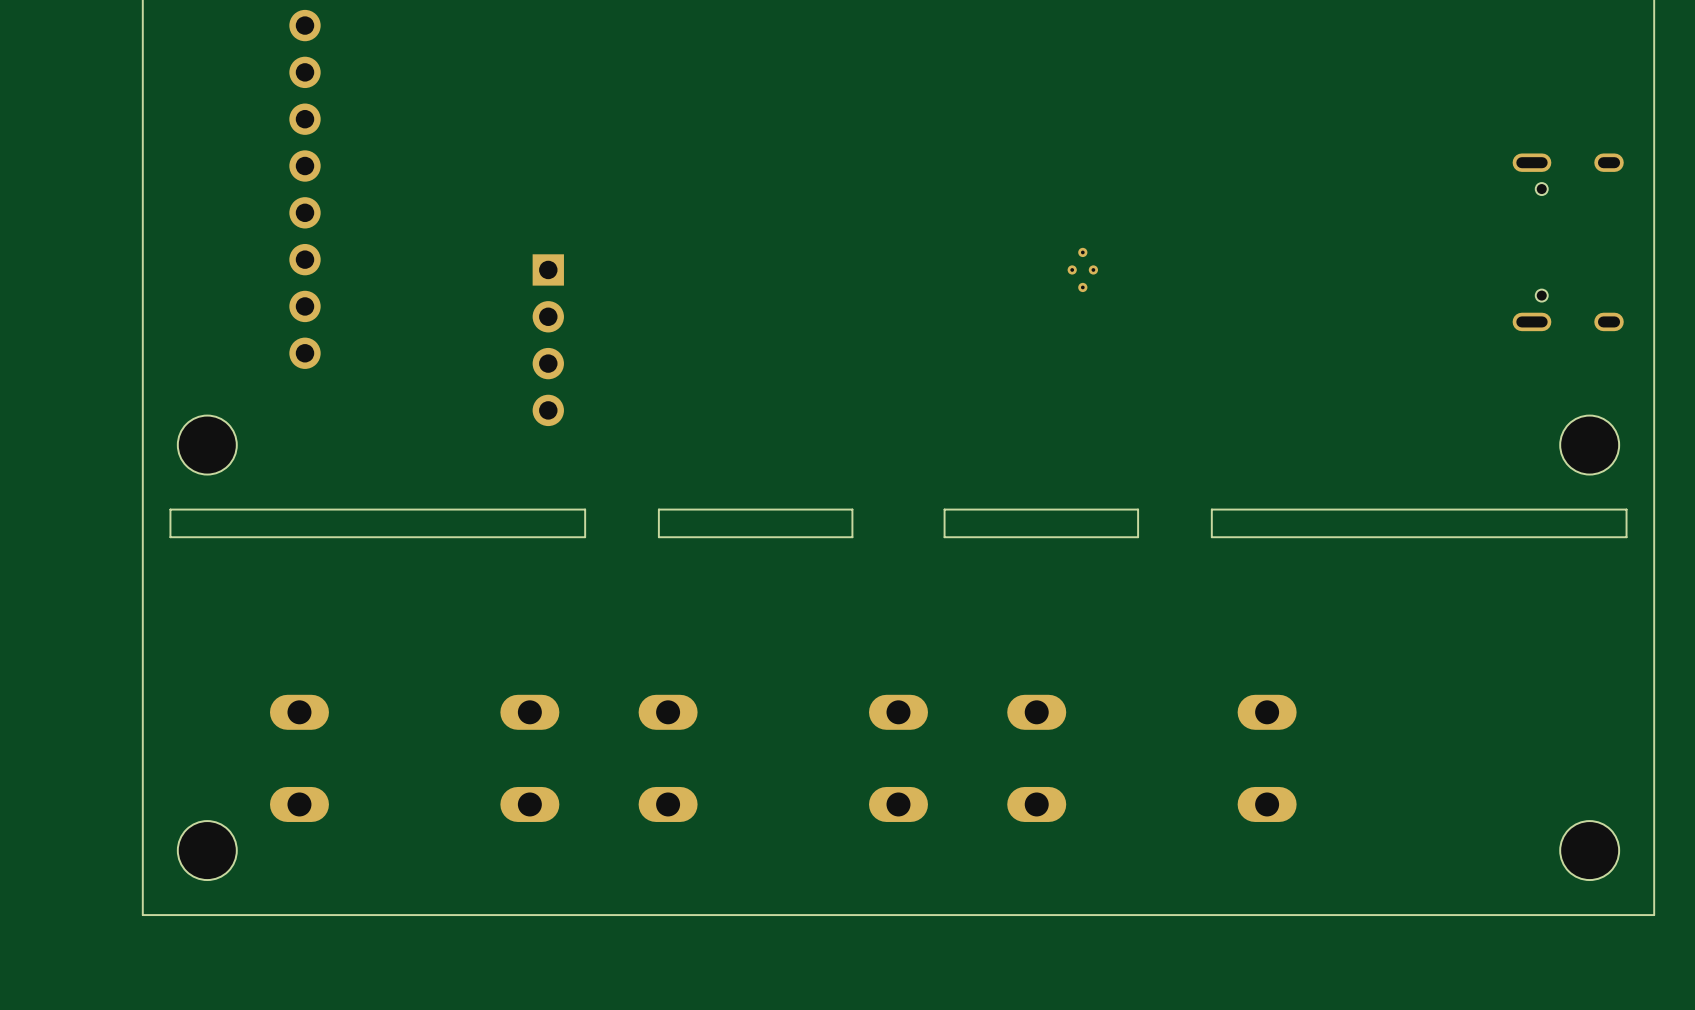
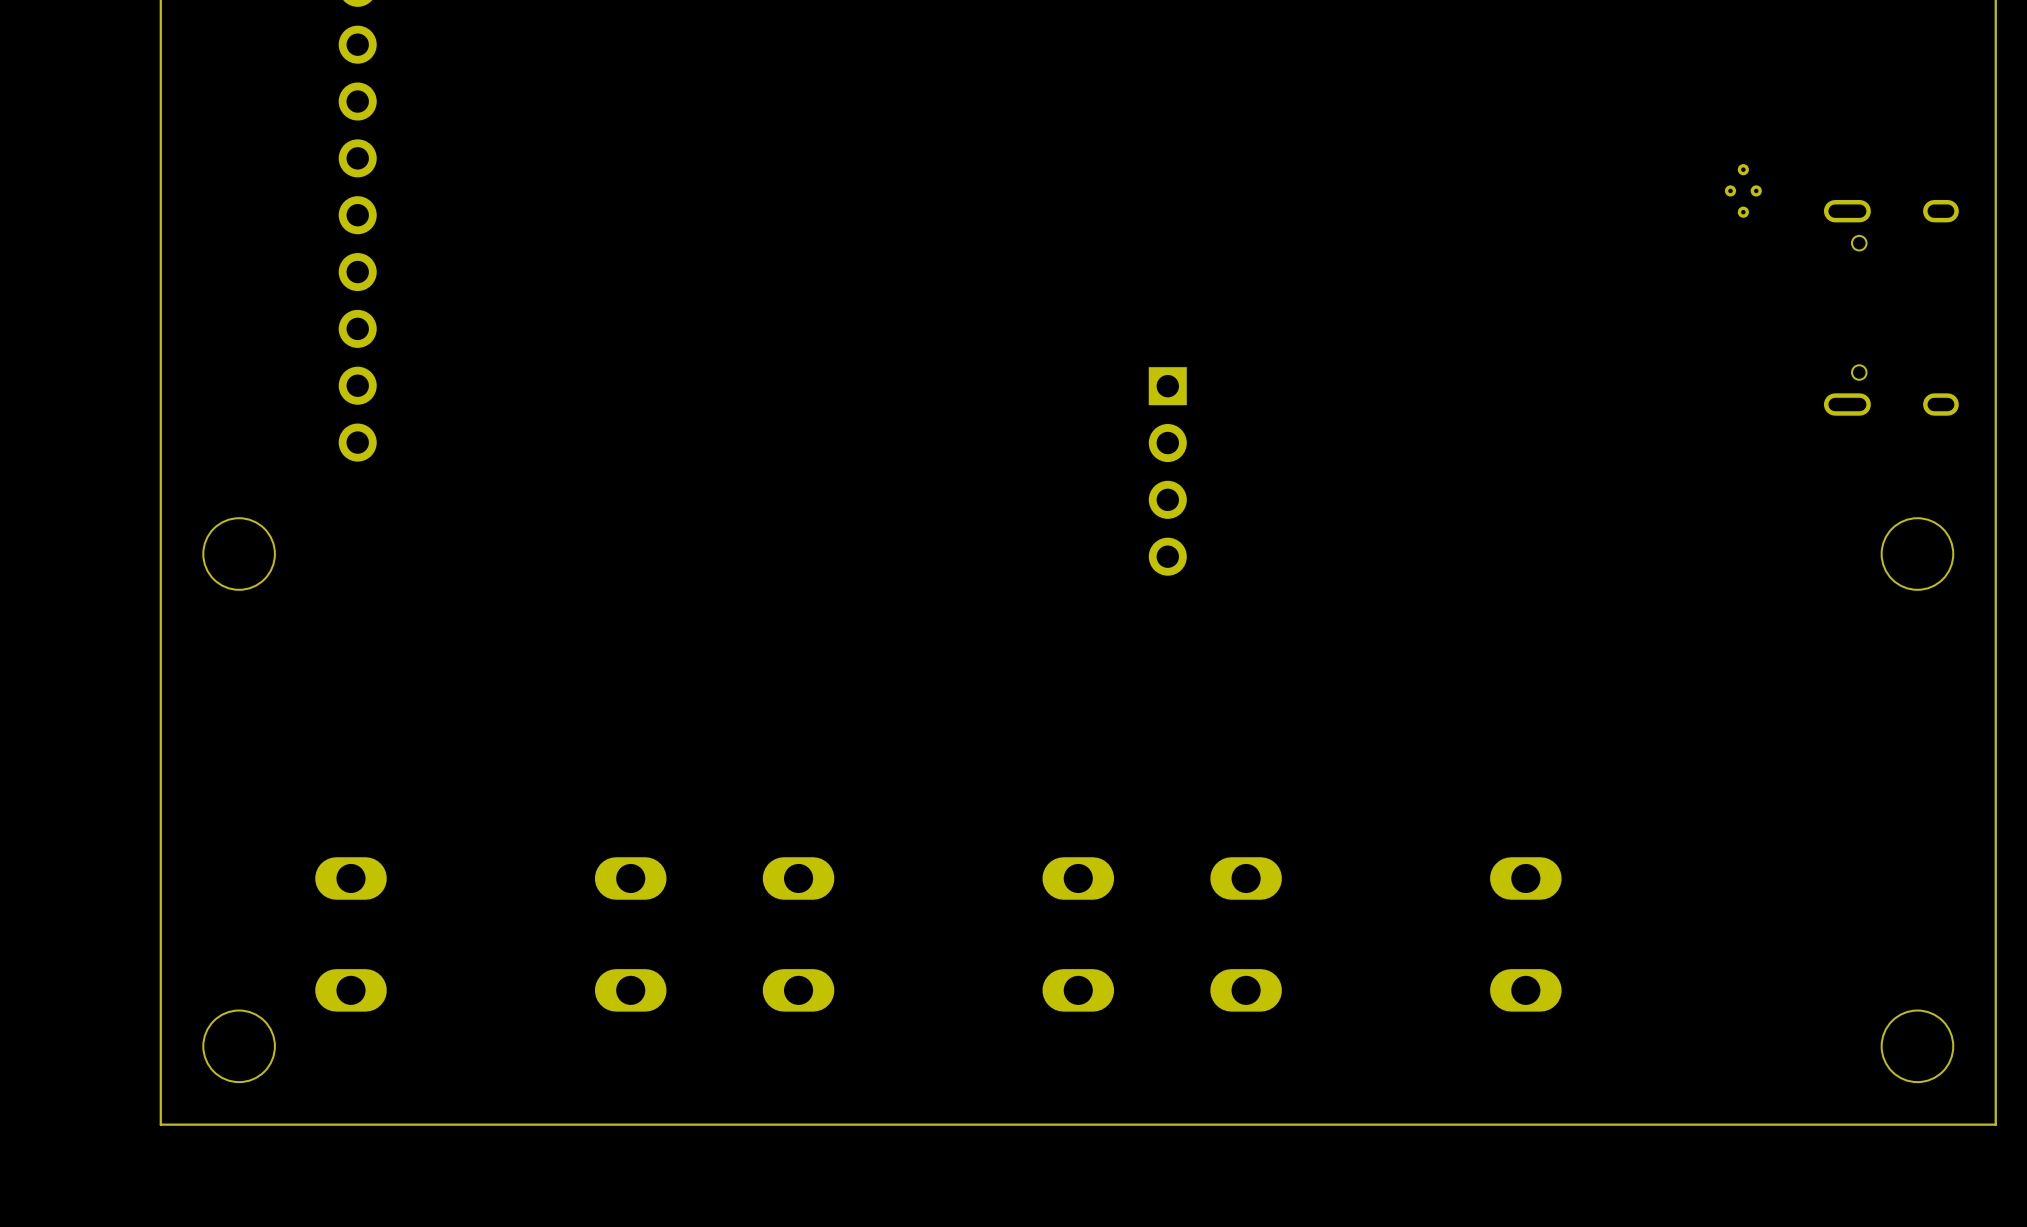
part position: (1082, 269) -> (1743, 190)
part position: (548, 340) -> (1167, 471)
board edge: (585, 509) (170, 509) (170, 537) (585, 537) (585, 509) -> none
board edge: (852, 509) (658, 509) (658, 537) (852, 537) (852, 509) -> none
board edge: (1138, 509) (944, 509) (944, 537) (1138, 537) (1138, 509) -> none
board edge: (1626, 509) (1211, 509) (1211, 537) (1626, 537) (1626, 509) -> none

